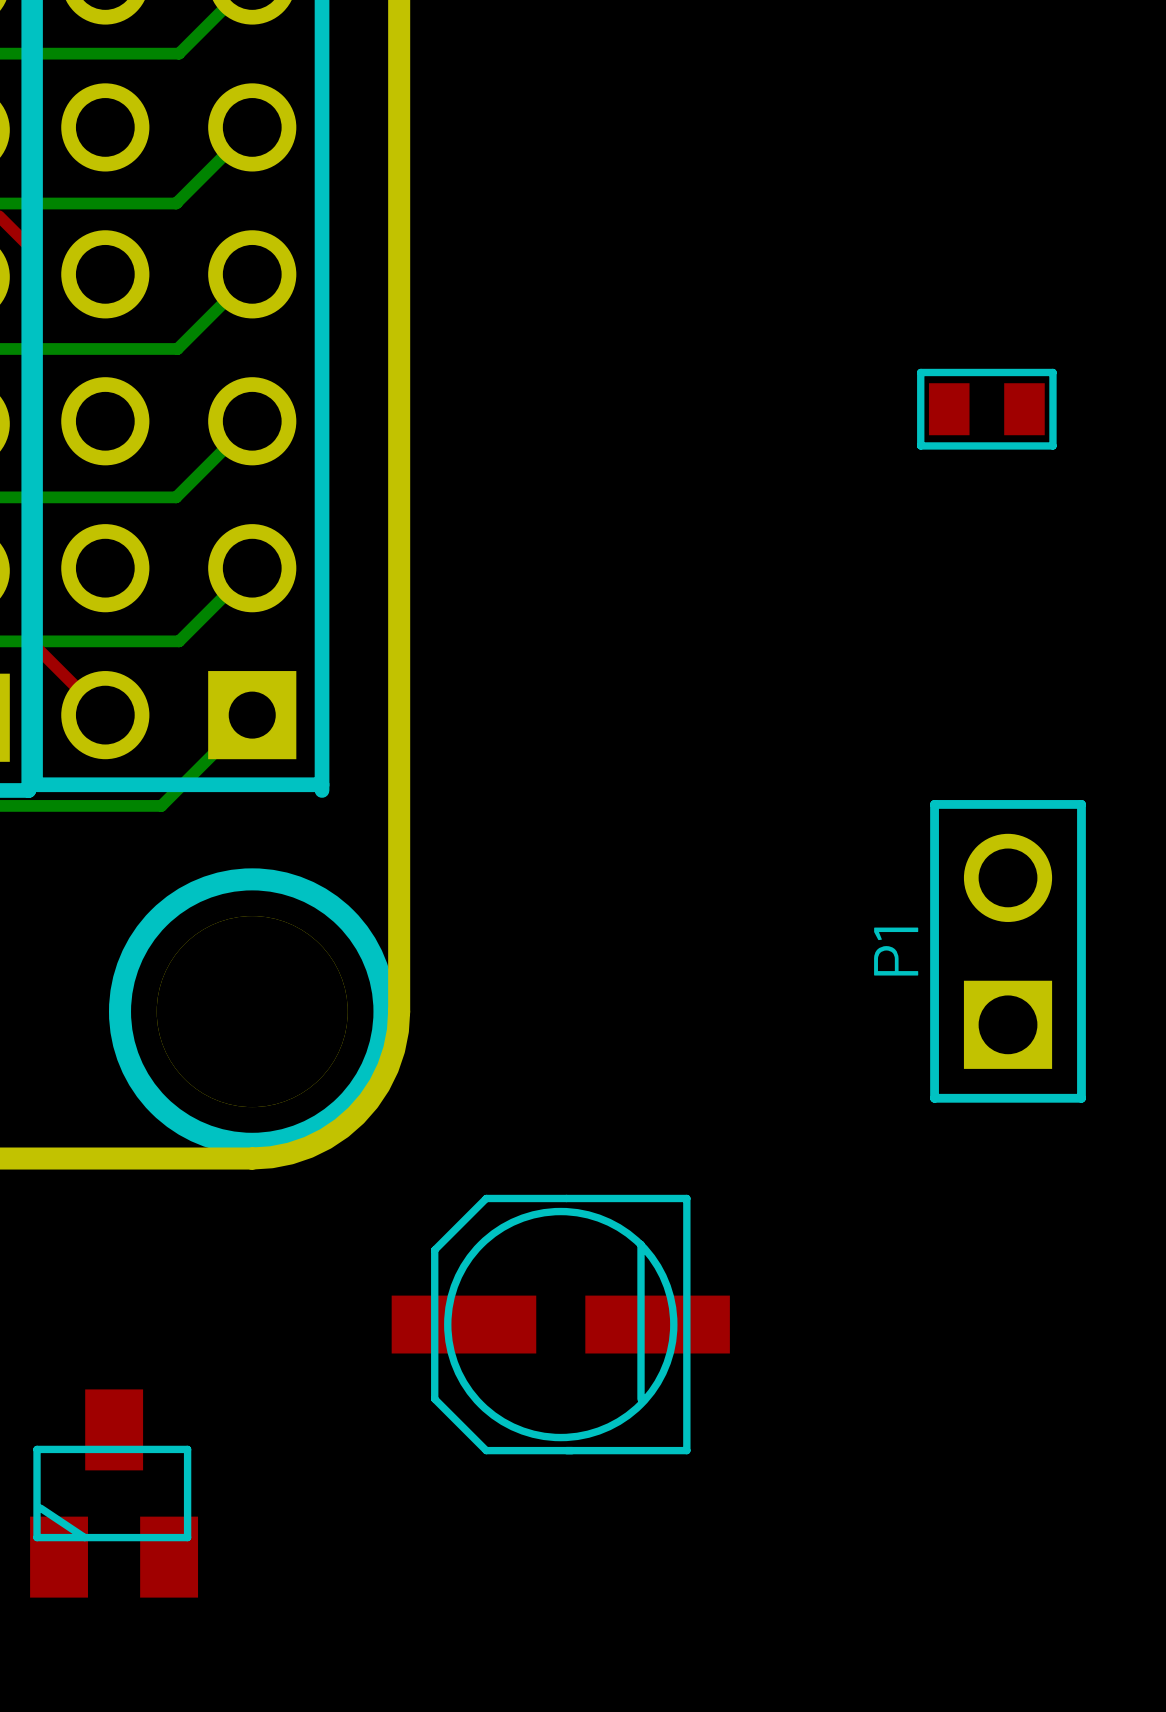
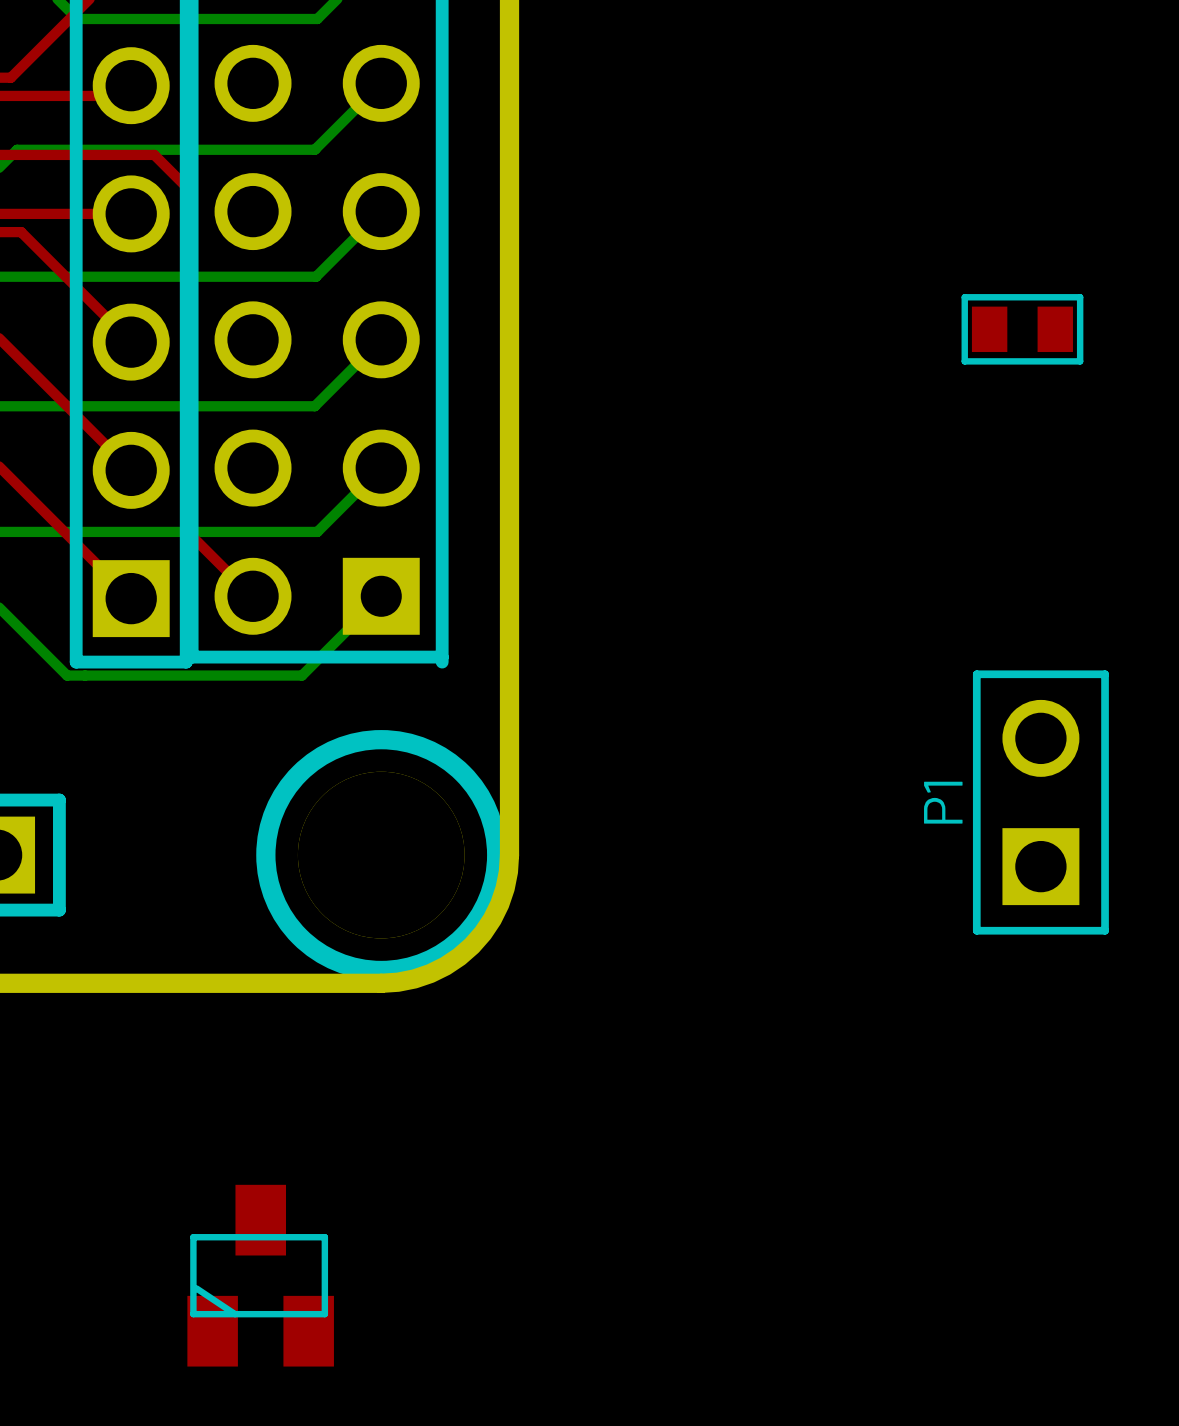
part: (560, 1324) -> none

